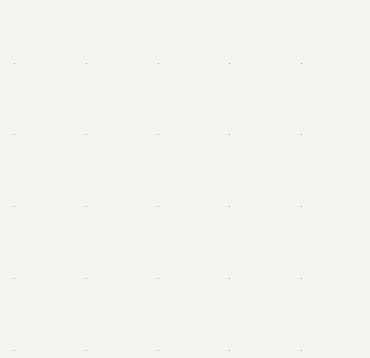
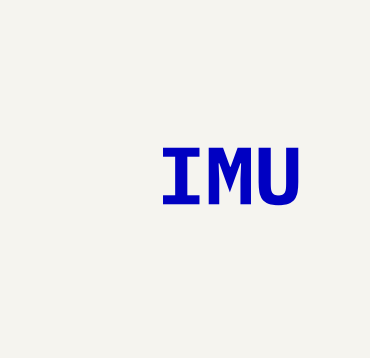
text: none -> IMU (230, 176)

